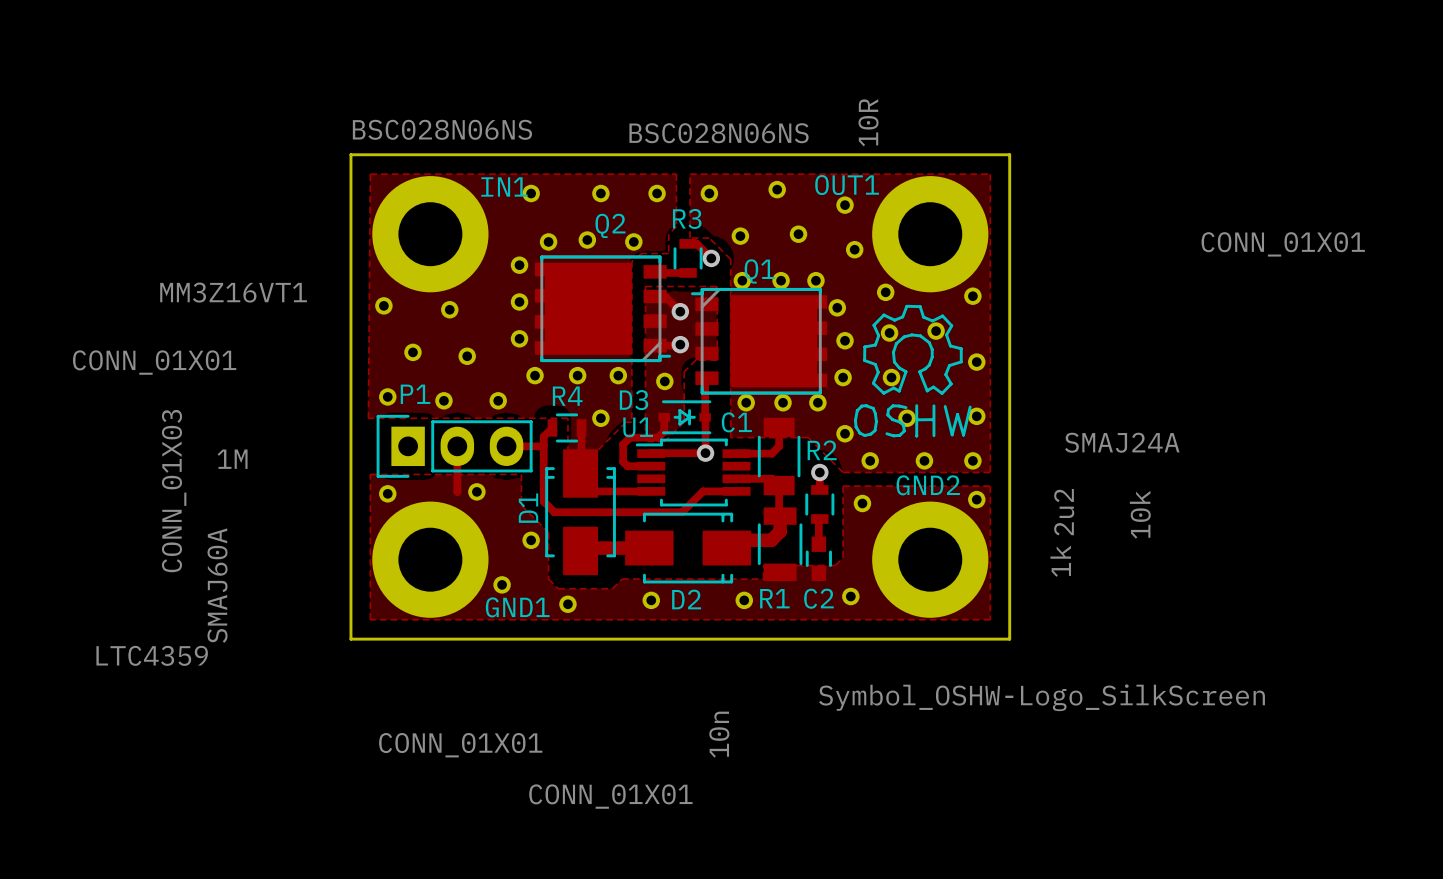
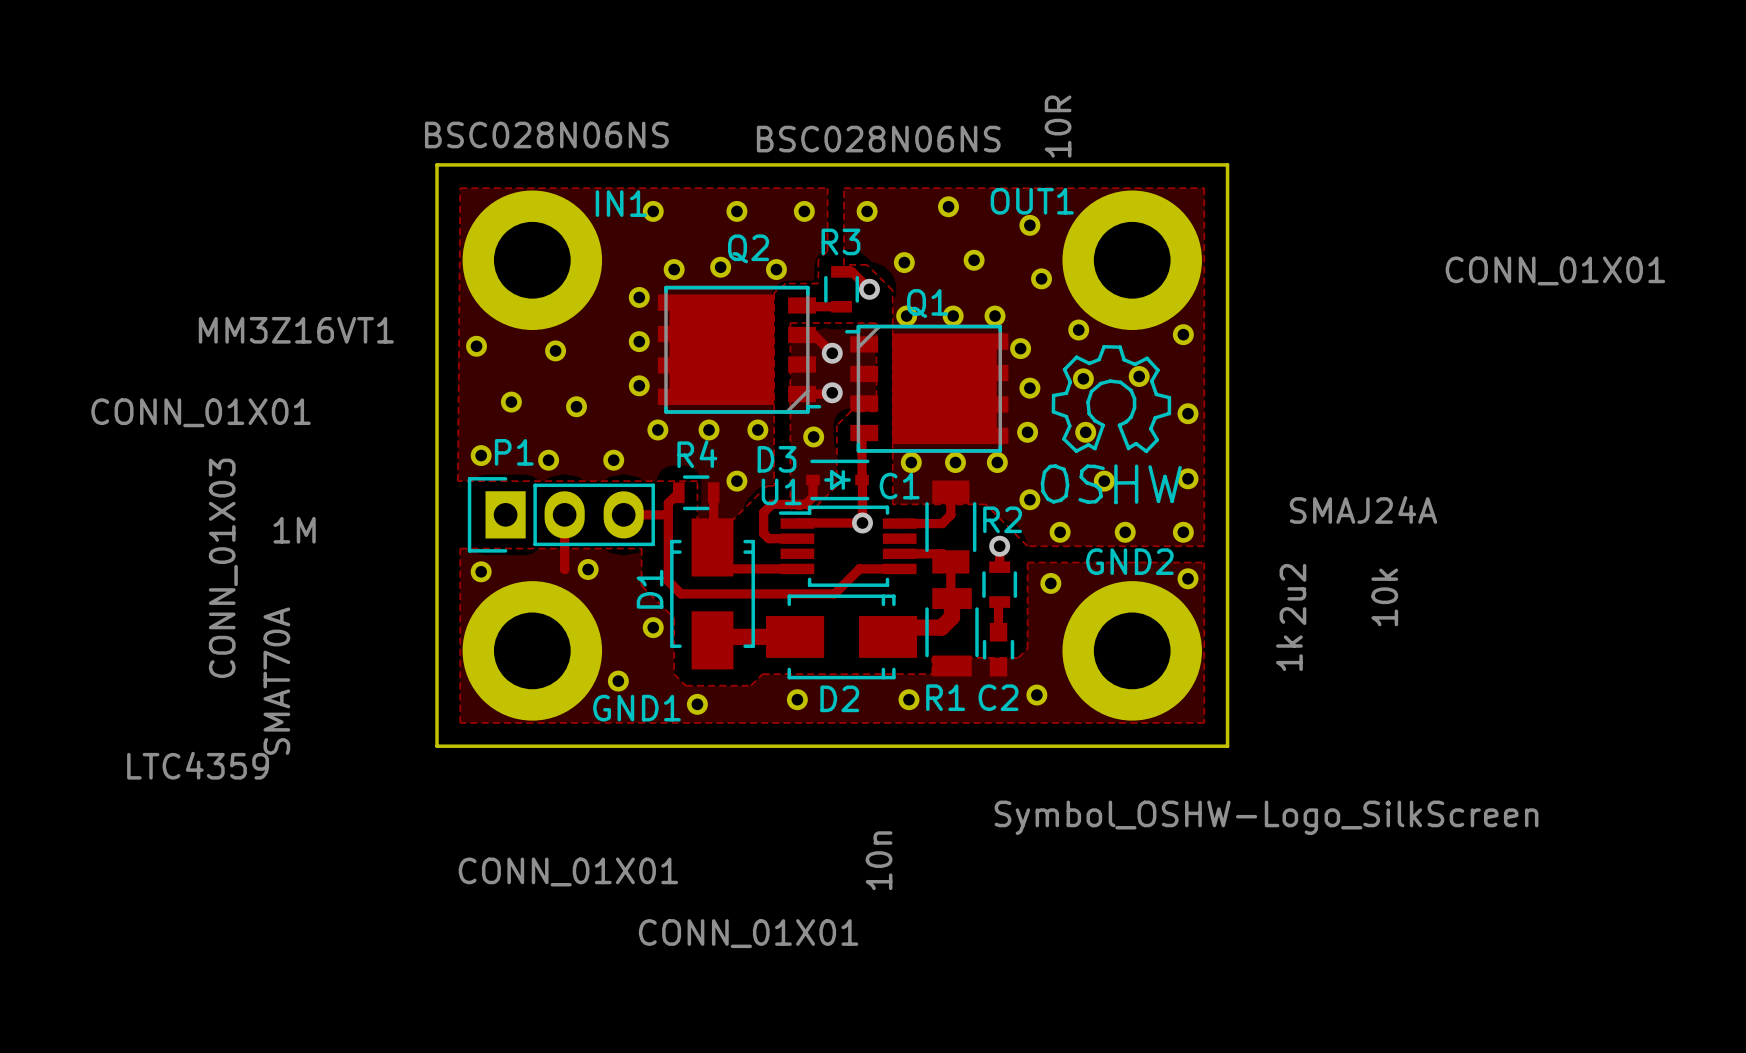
D1 value: SMAJ60A (217, 585) -> SMAT70A (276, 681)

